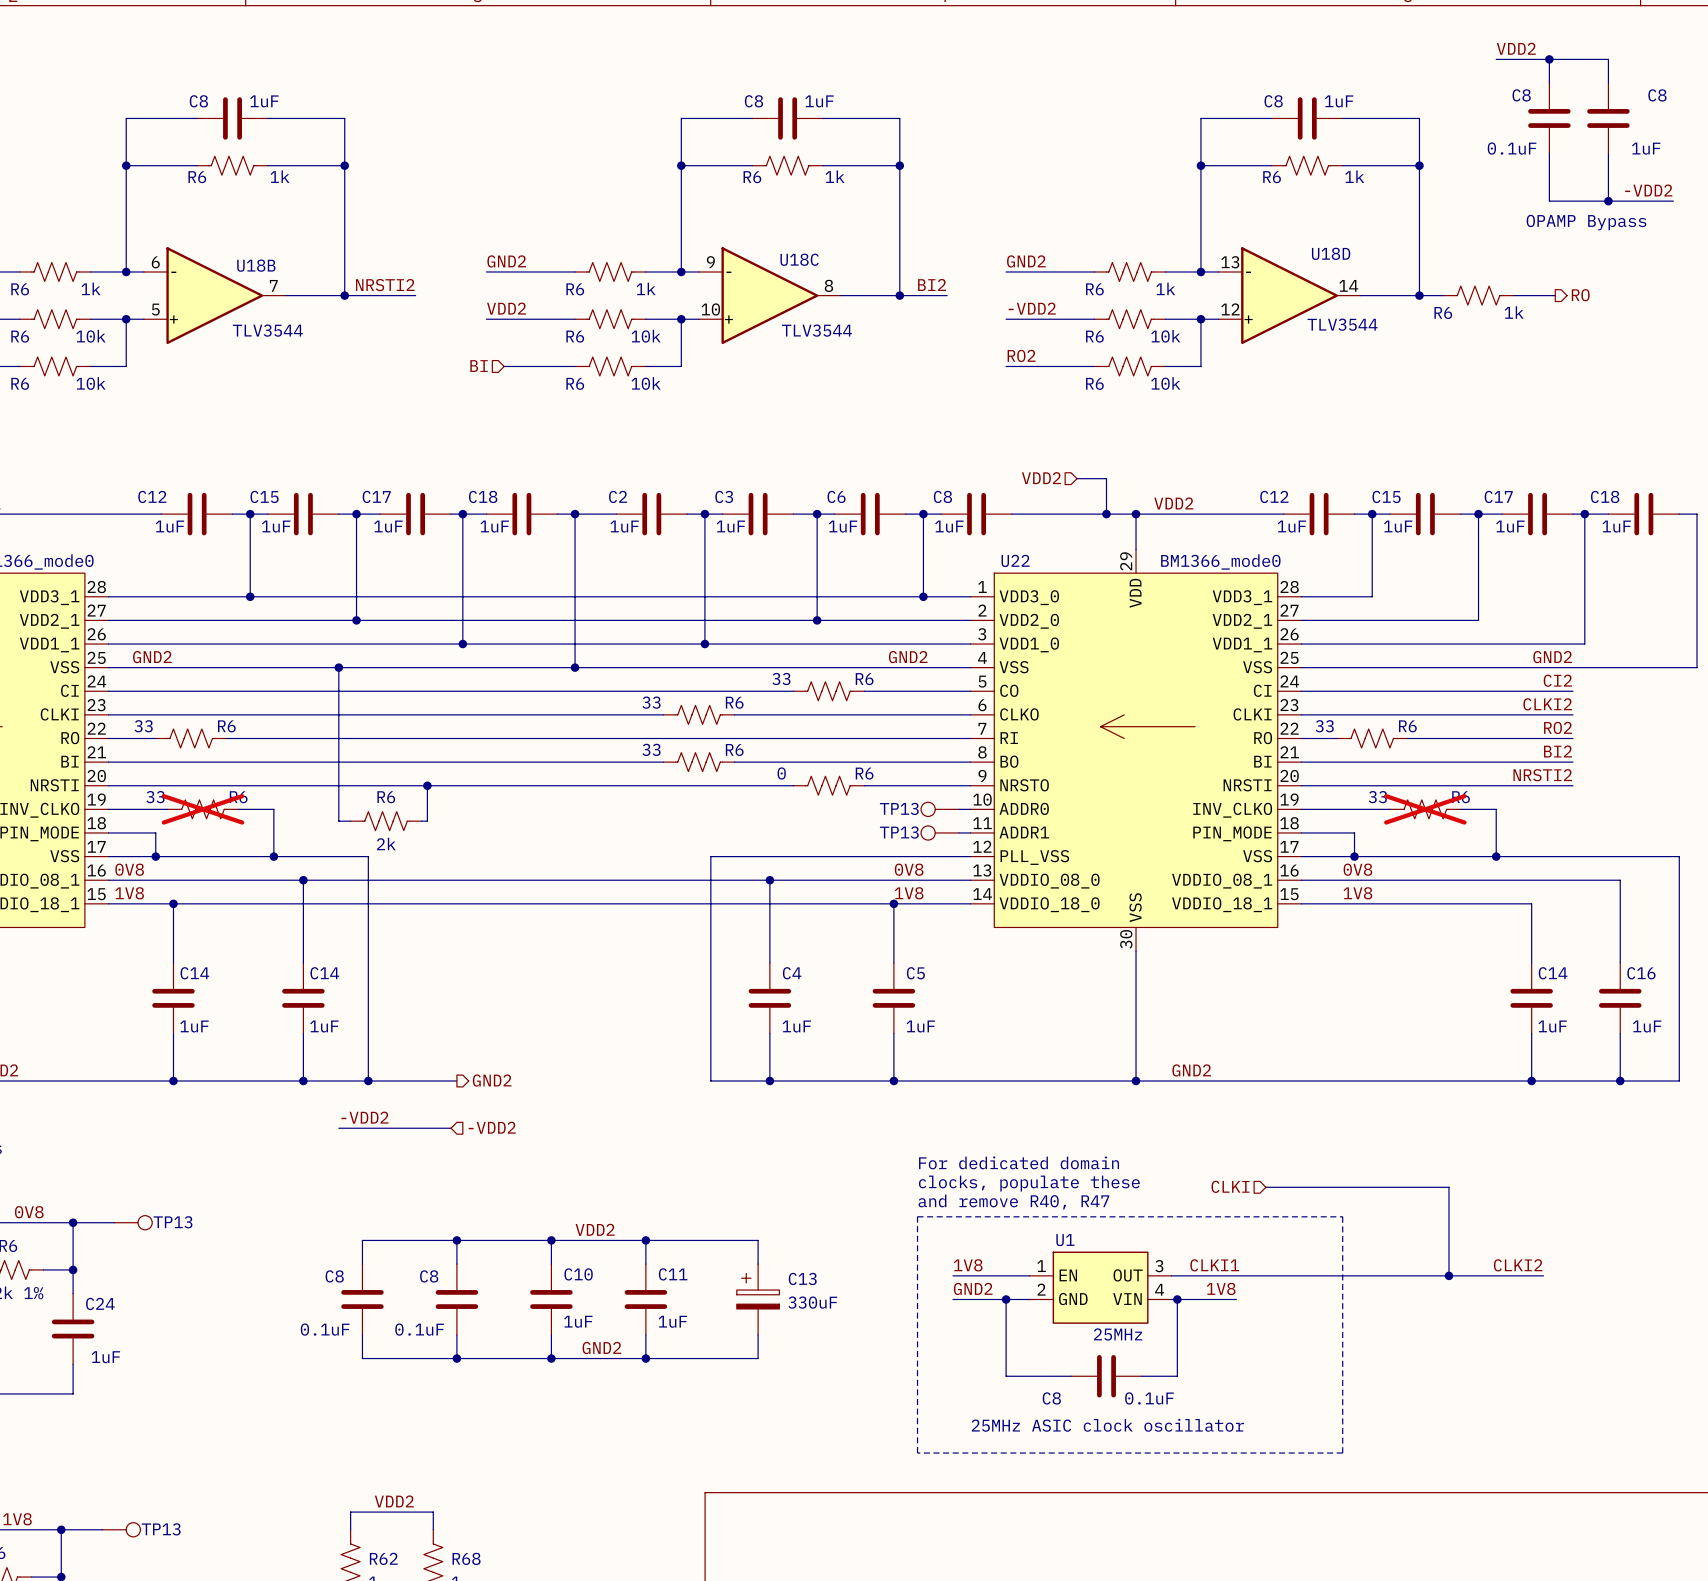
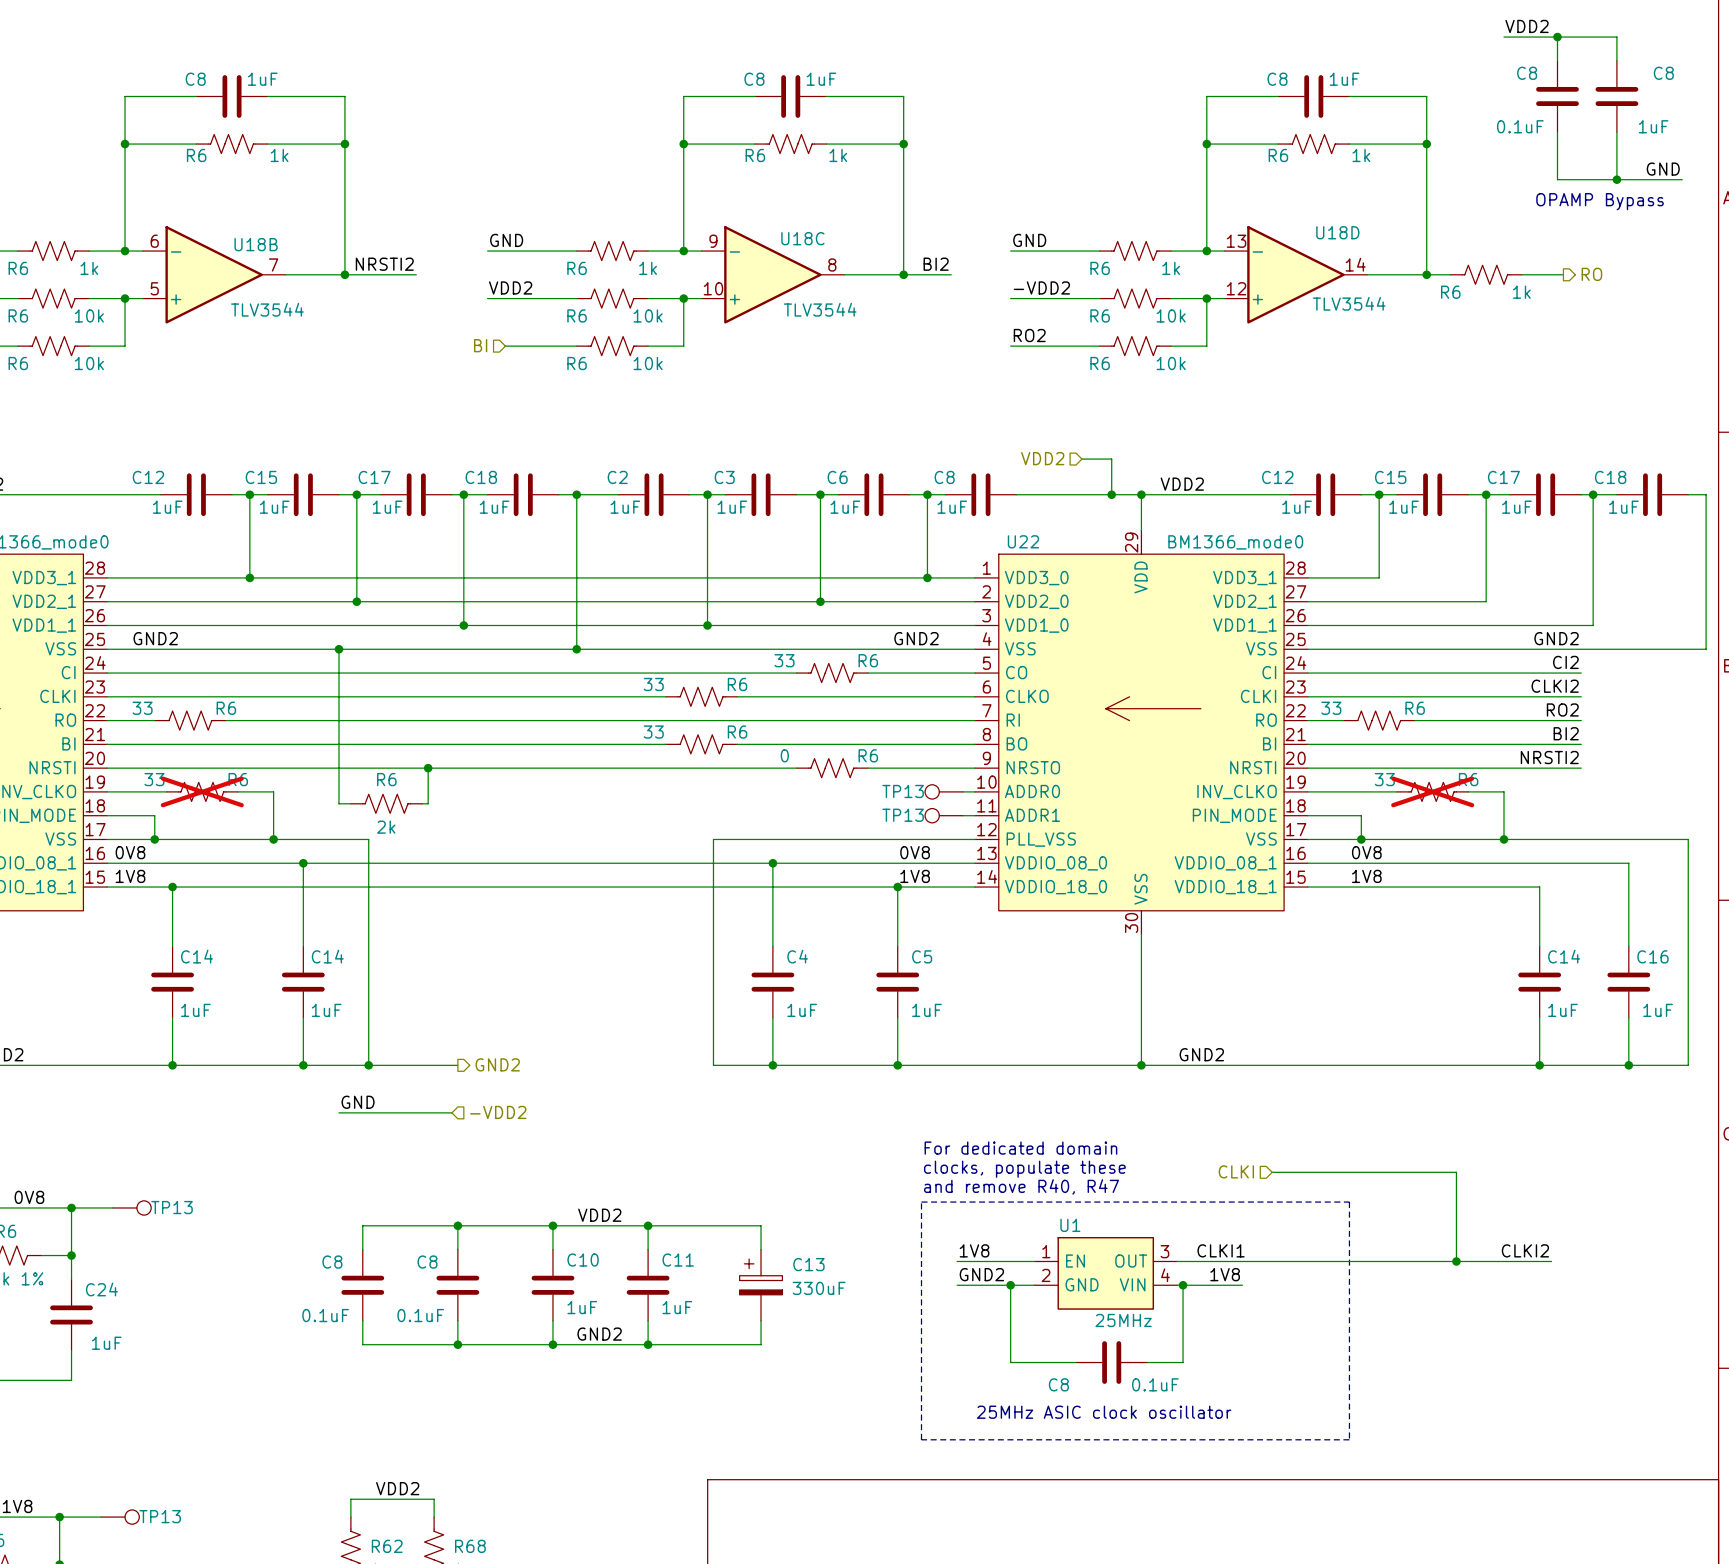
label: -VDD2 (1648, 190) -> GND (1663, 169)
label: GND2 (506, 261) -> GND (506, 240)
label: GND2 (1026, 261) -> GND (1029, 240)
label: -VDD2 (364, 1117) -> GND (358, 1102)

